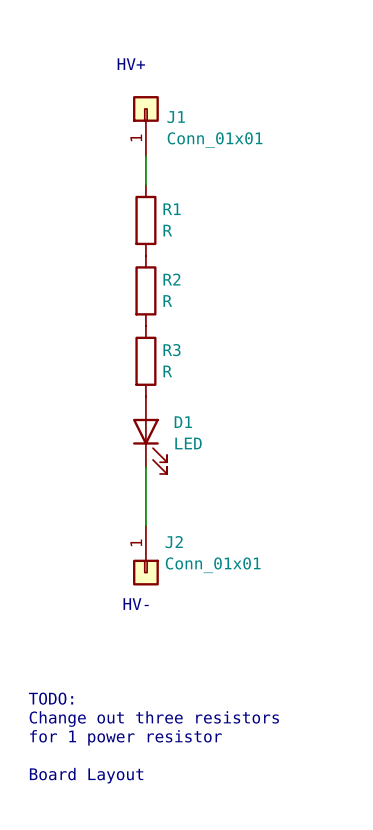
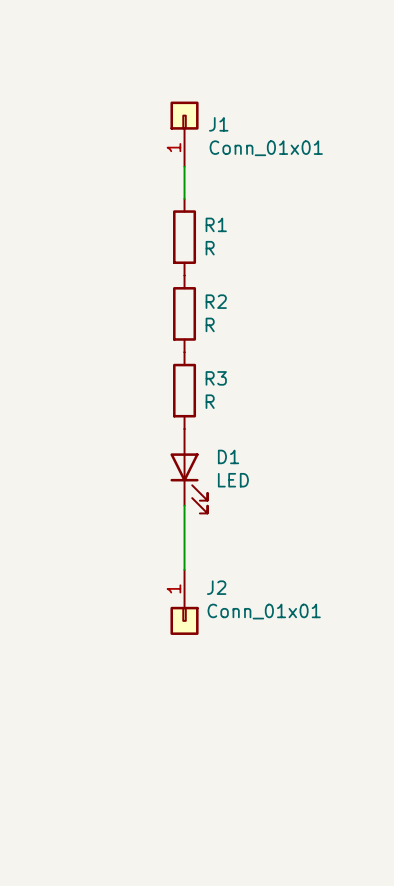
text: HV+ (131, 64) -> none
text: HV- (136, 604) -> none
text: TODO: (51, 698) -> none
text: Change out three resistors (154, 719) -> none
text: for 1 power resistor (125, 737) -> none
text: Board Layout (86, 775) -> none

